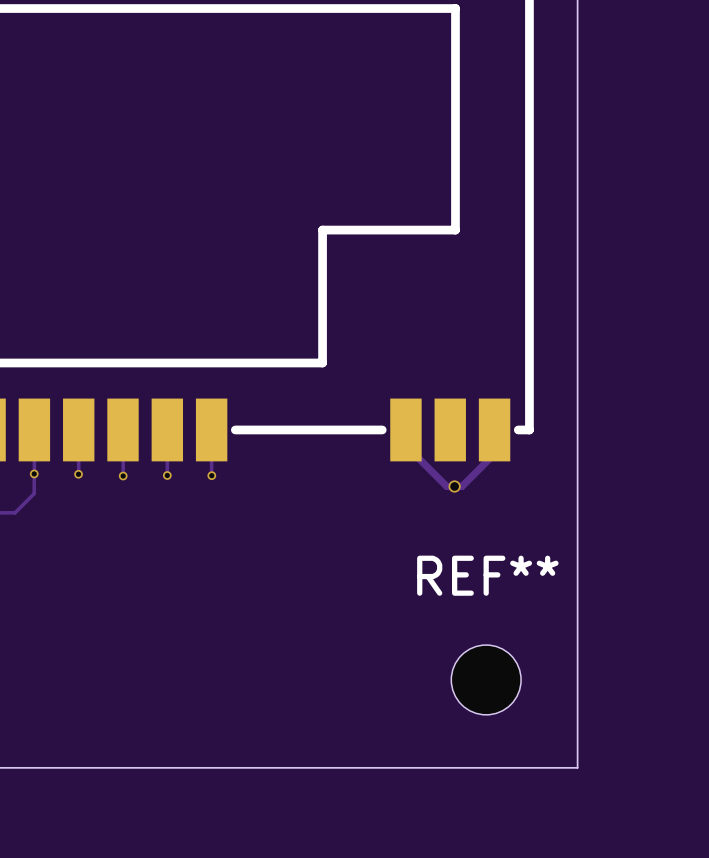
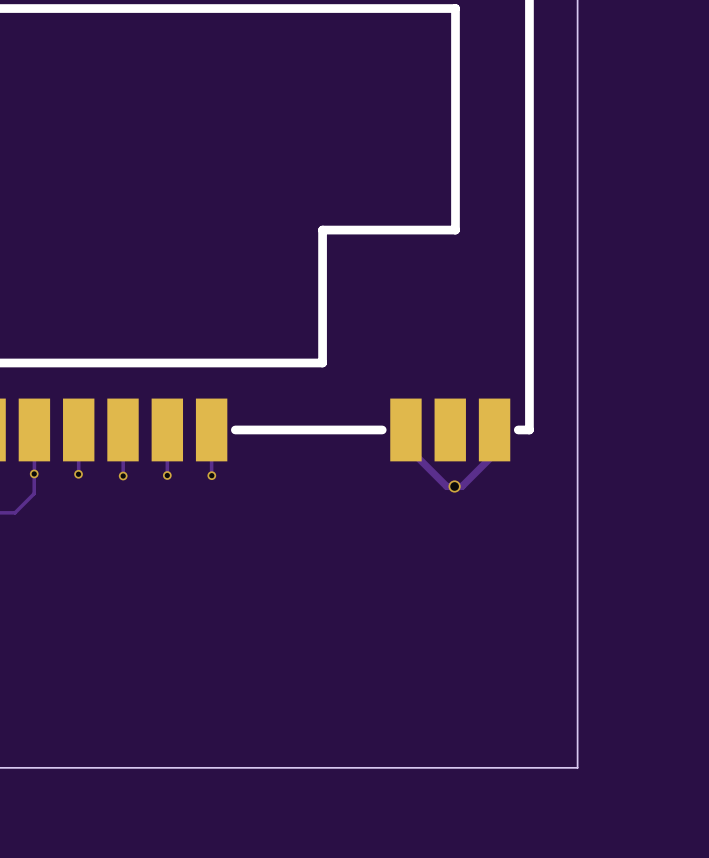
REF**: (486, 679) -> none

